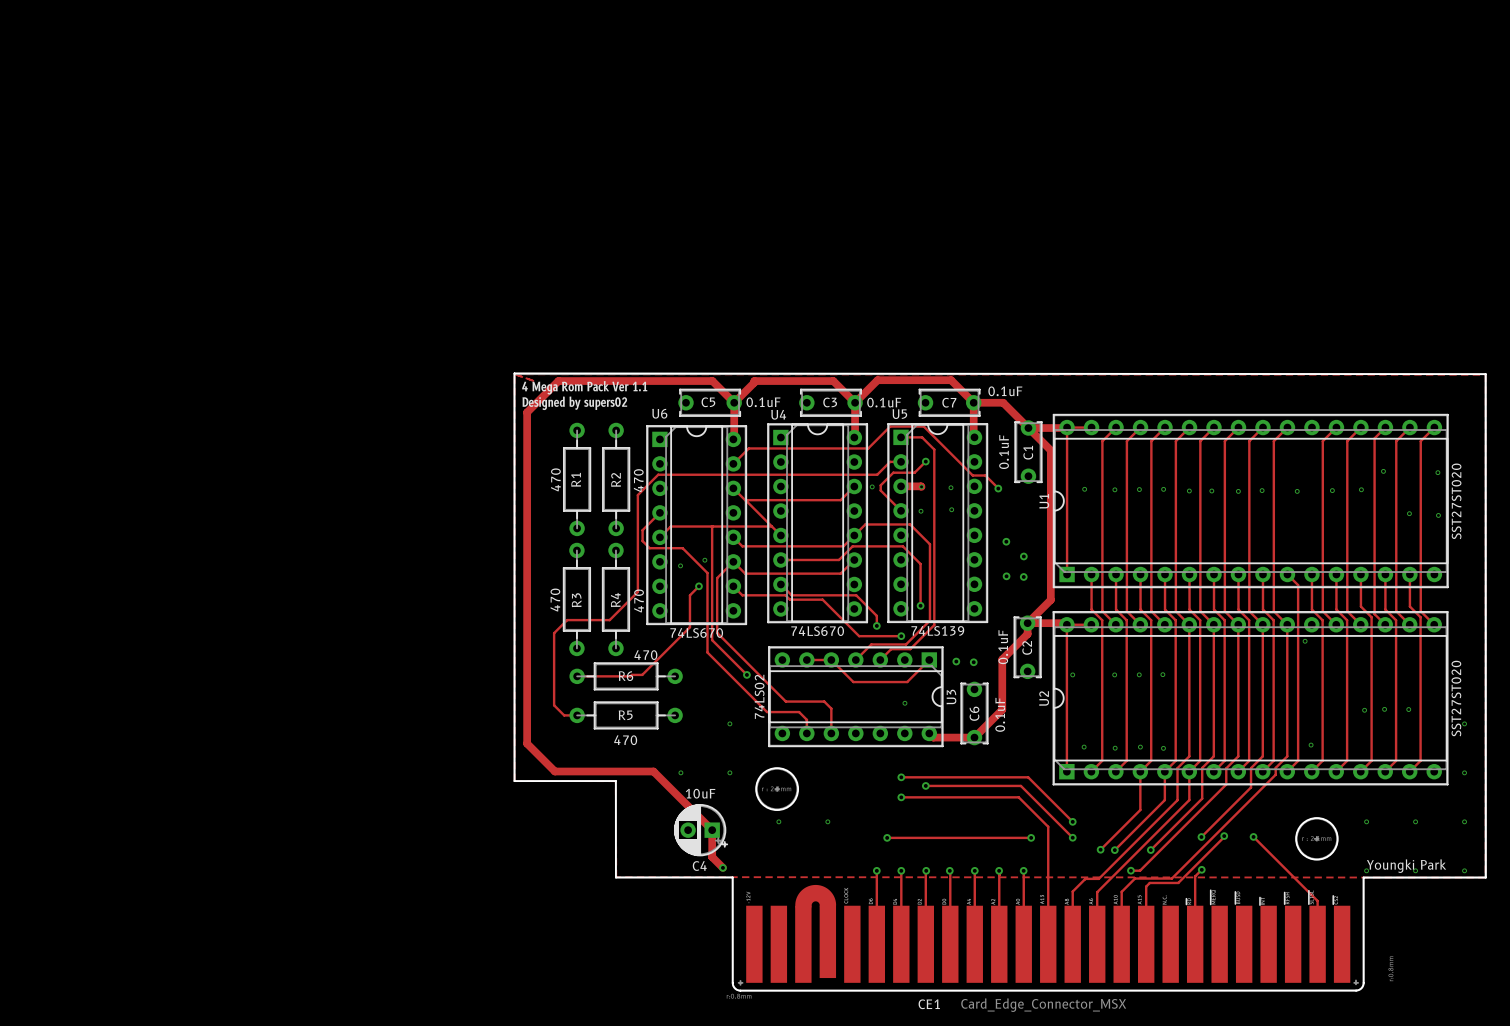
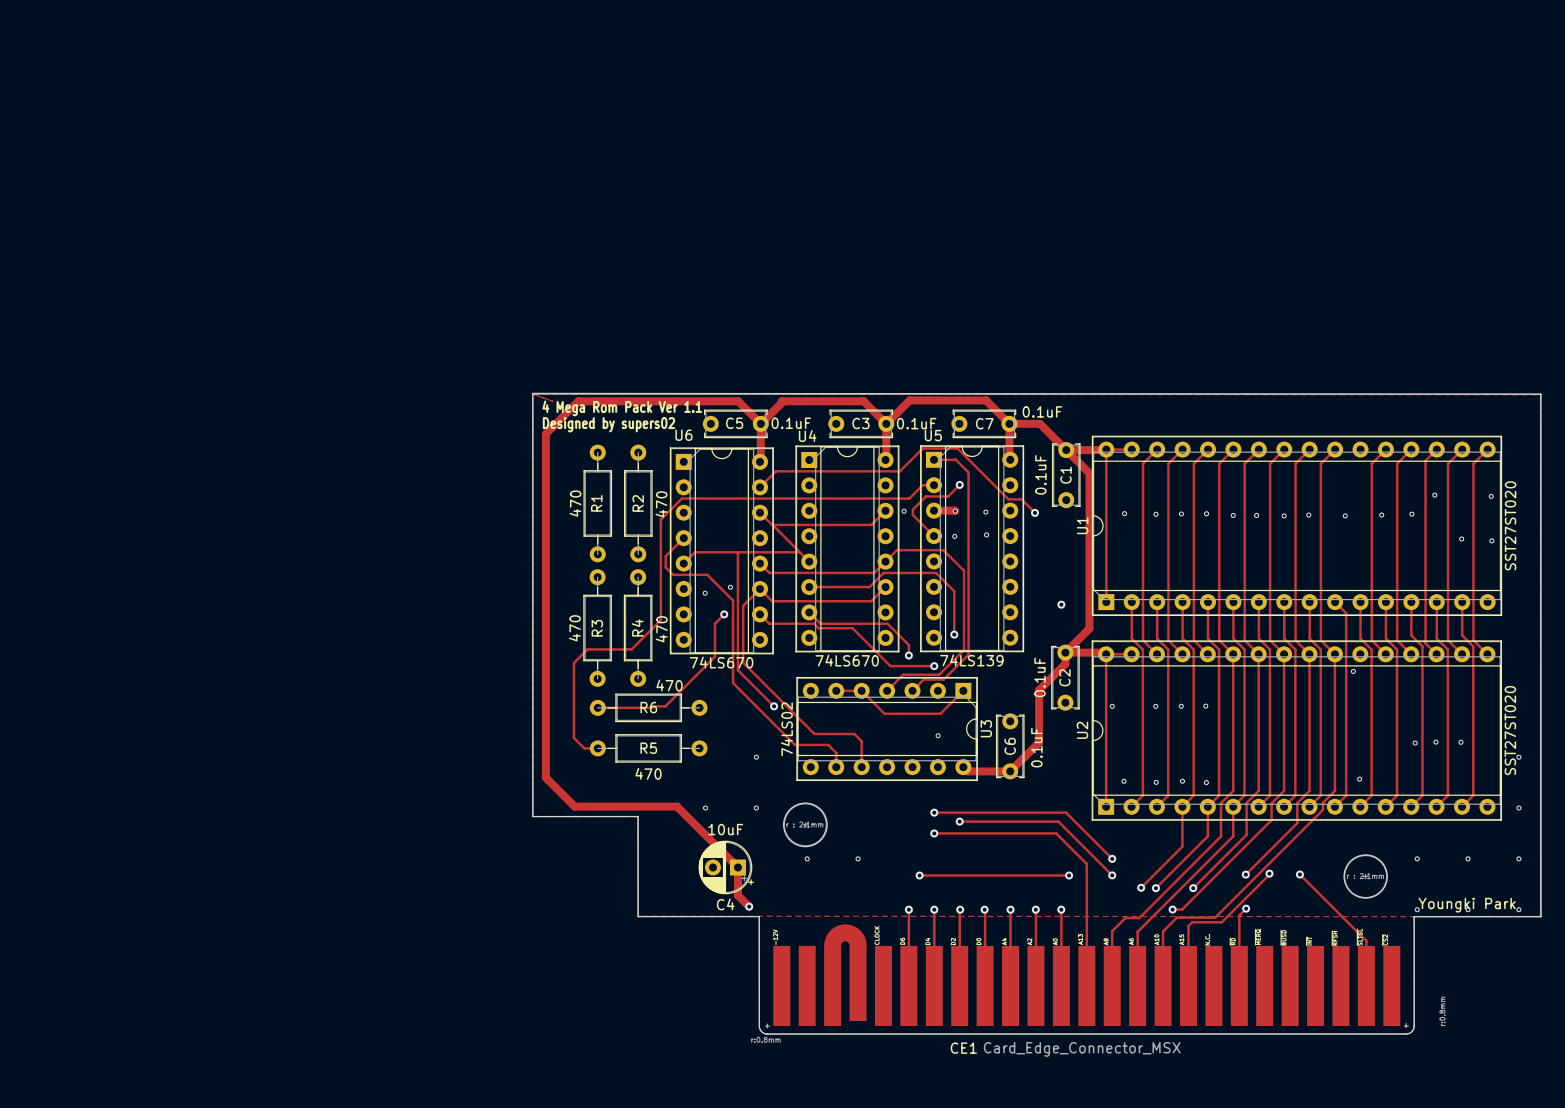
via: (1006, 541) -> none
via: (1023, 556) -> none
via: (1006, 576) -> none
via: (956, 661) -> none
via: (973, 662) -> none

